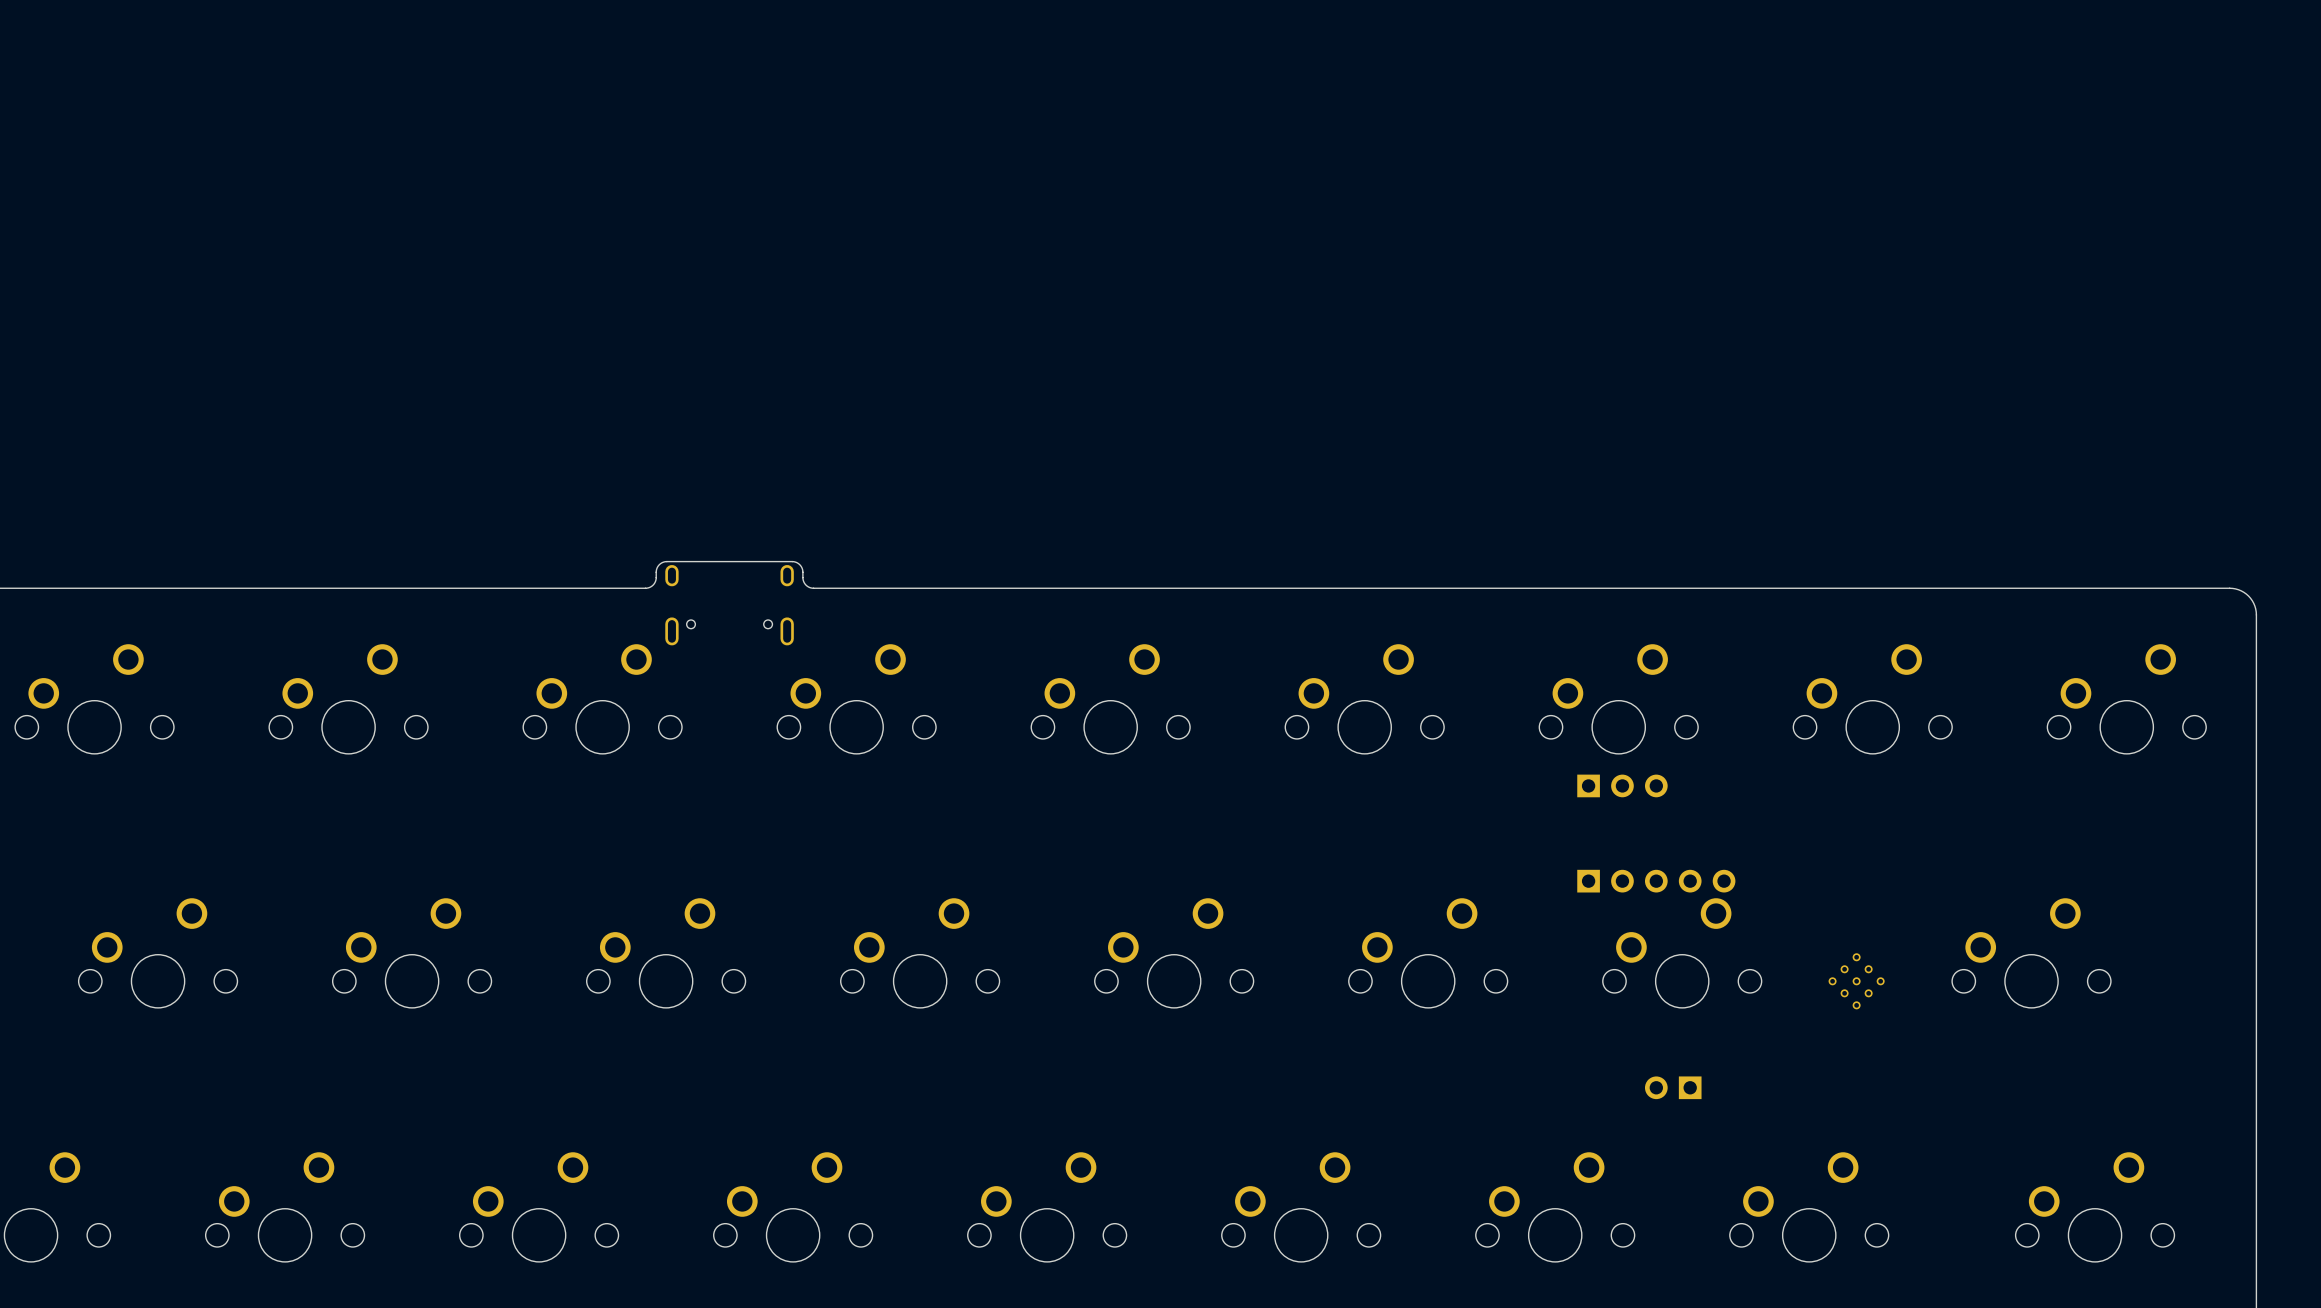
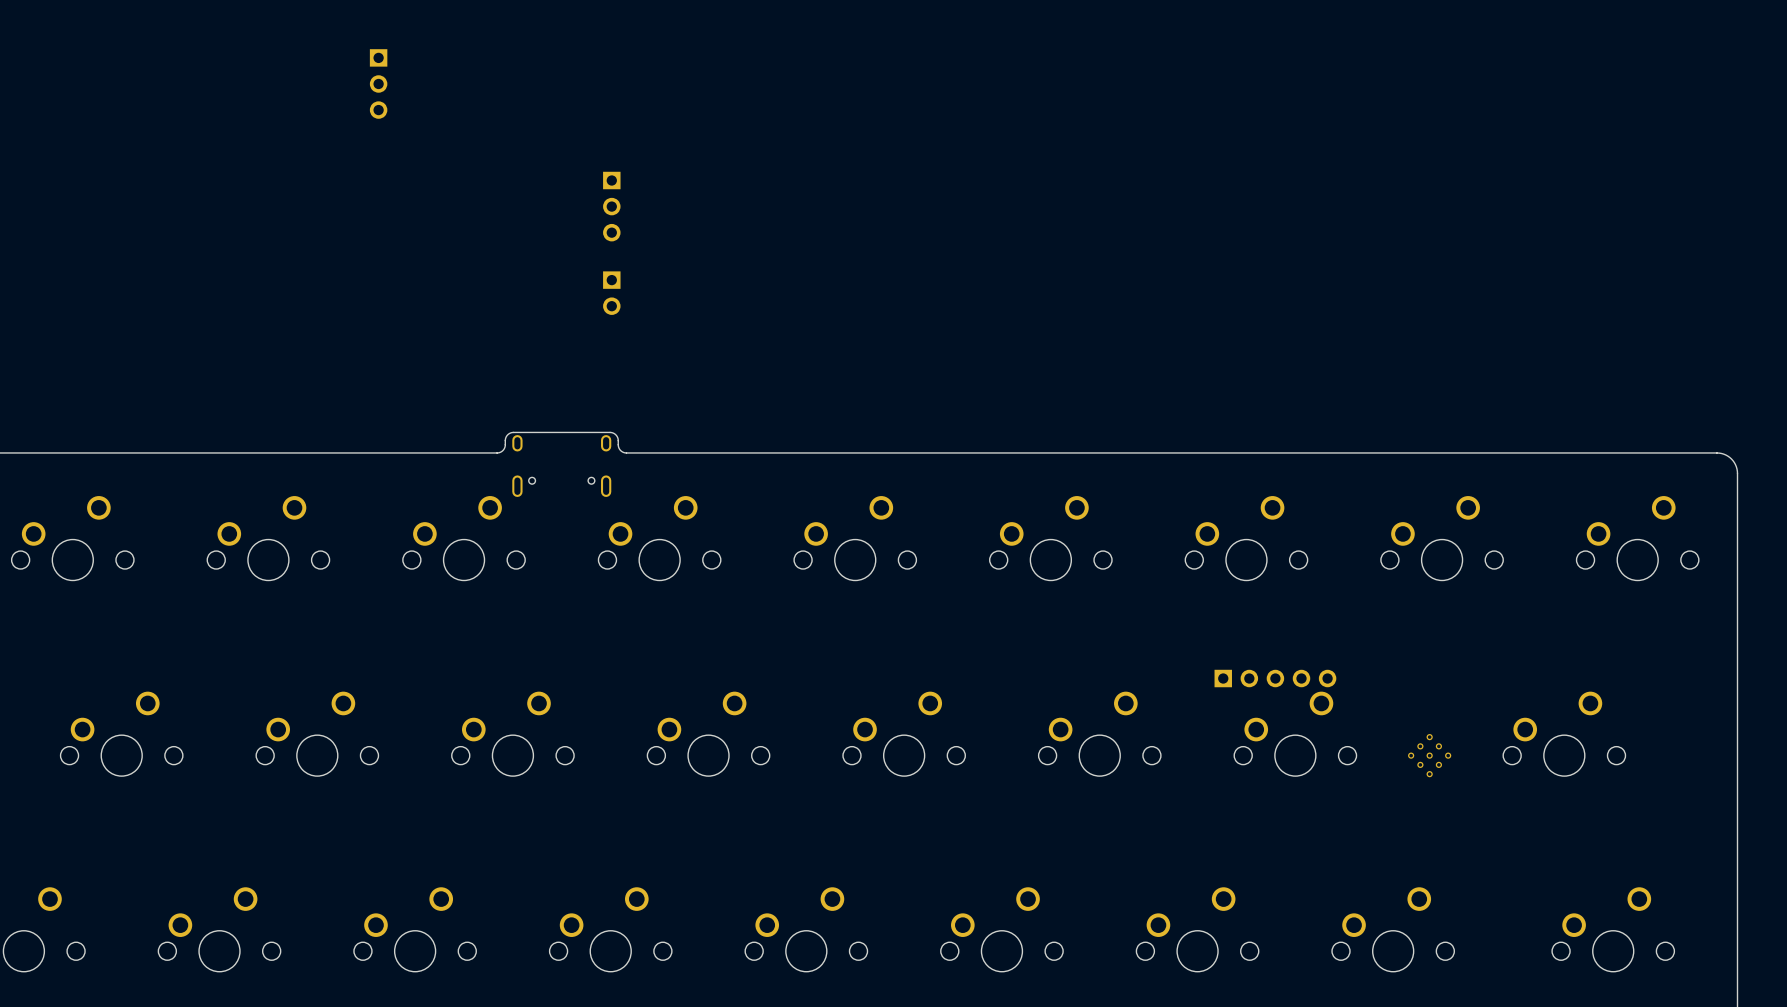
part: none -> (378, 83)
part: none -> (611, 206)
part: none -> (611, 293)
part: (1622, 785) -> none
part: (1673, 1087) -> none

